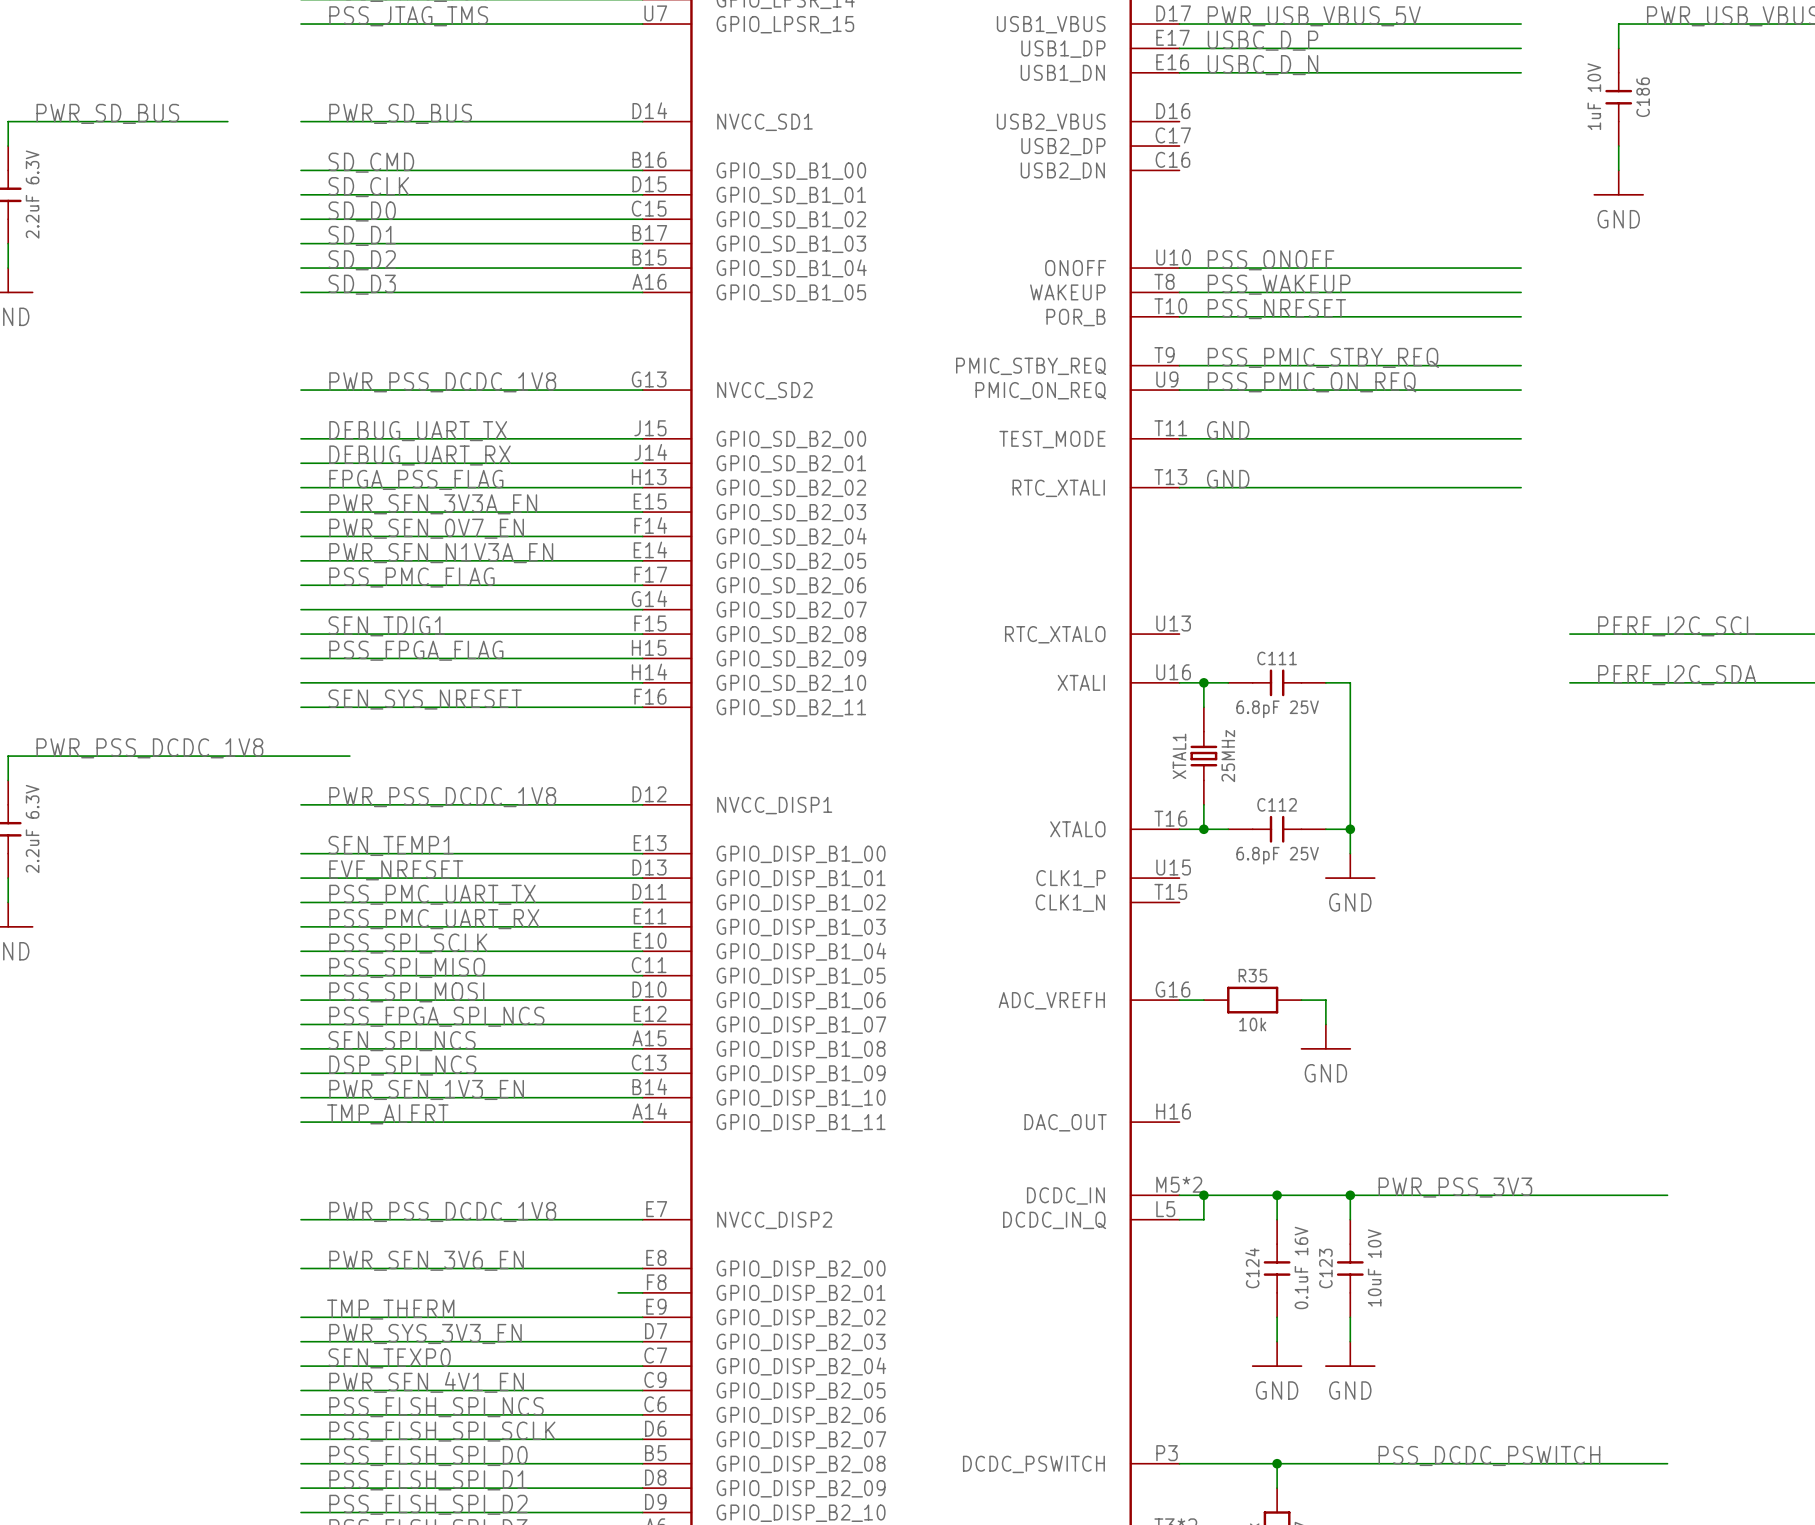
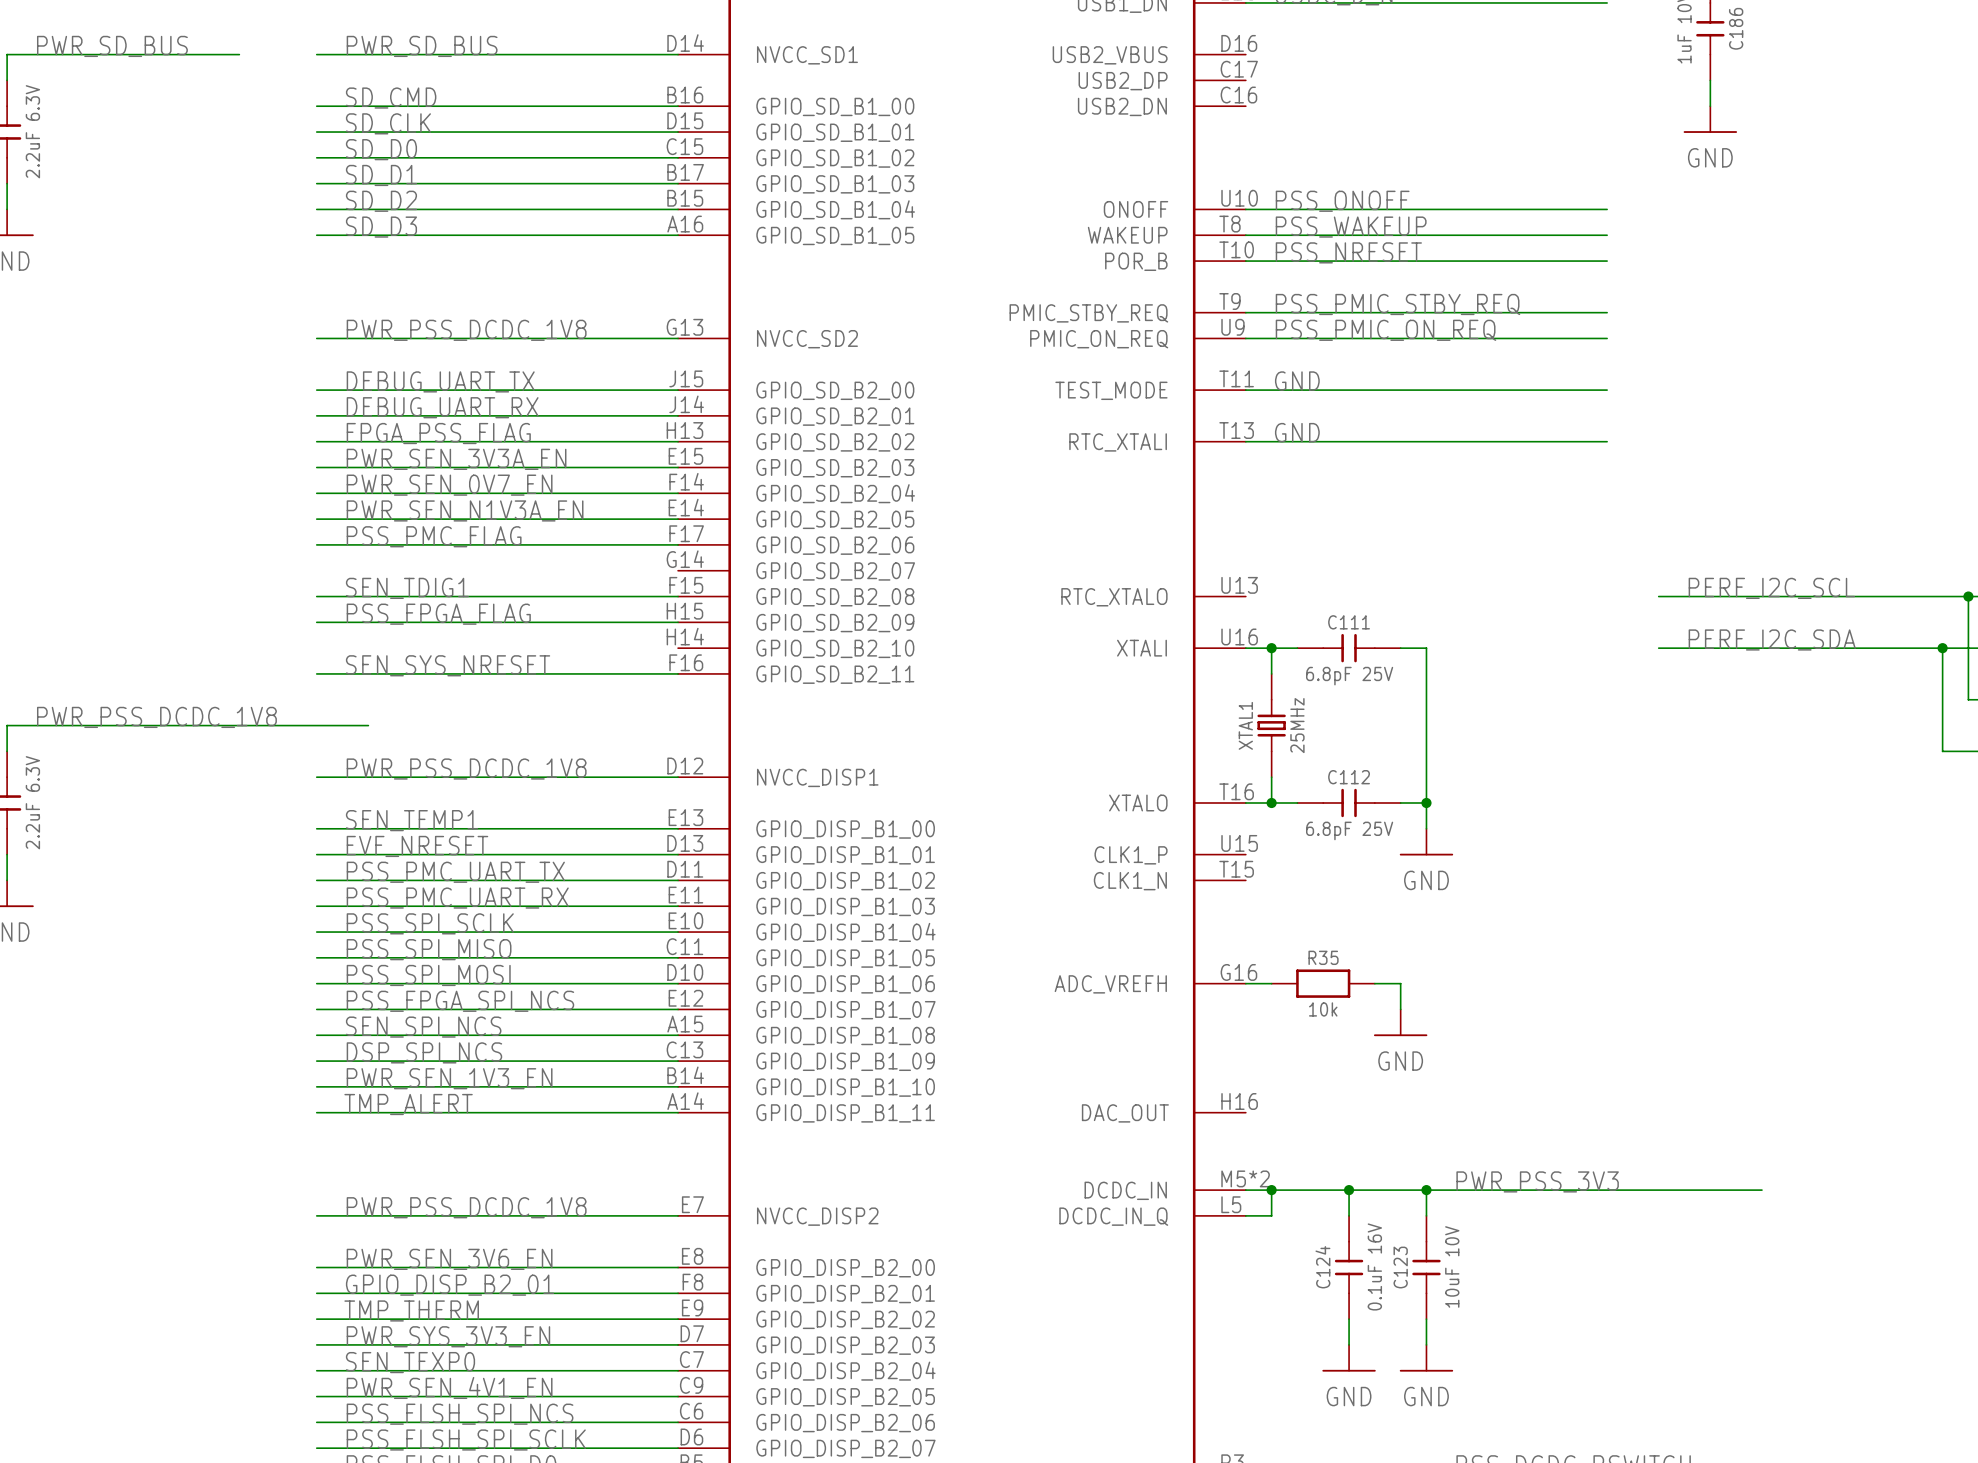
wire: (301, 609) (642, 609) -> none
wire: (301, 682) (642, 682) -> none
label: none -> GPIO_DISP_B2_01 (449, 1285)
wire: none -> (316, 1293) (652, 1293)

